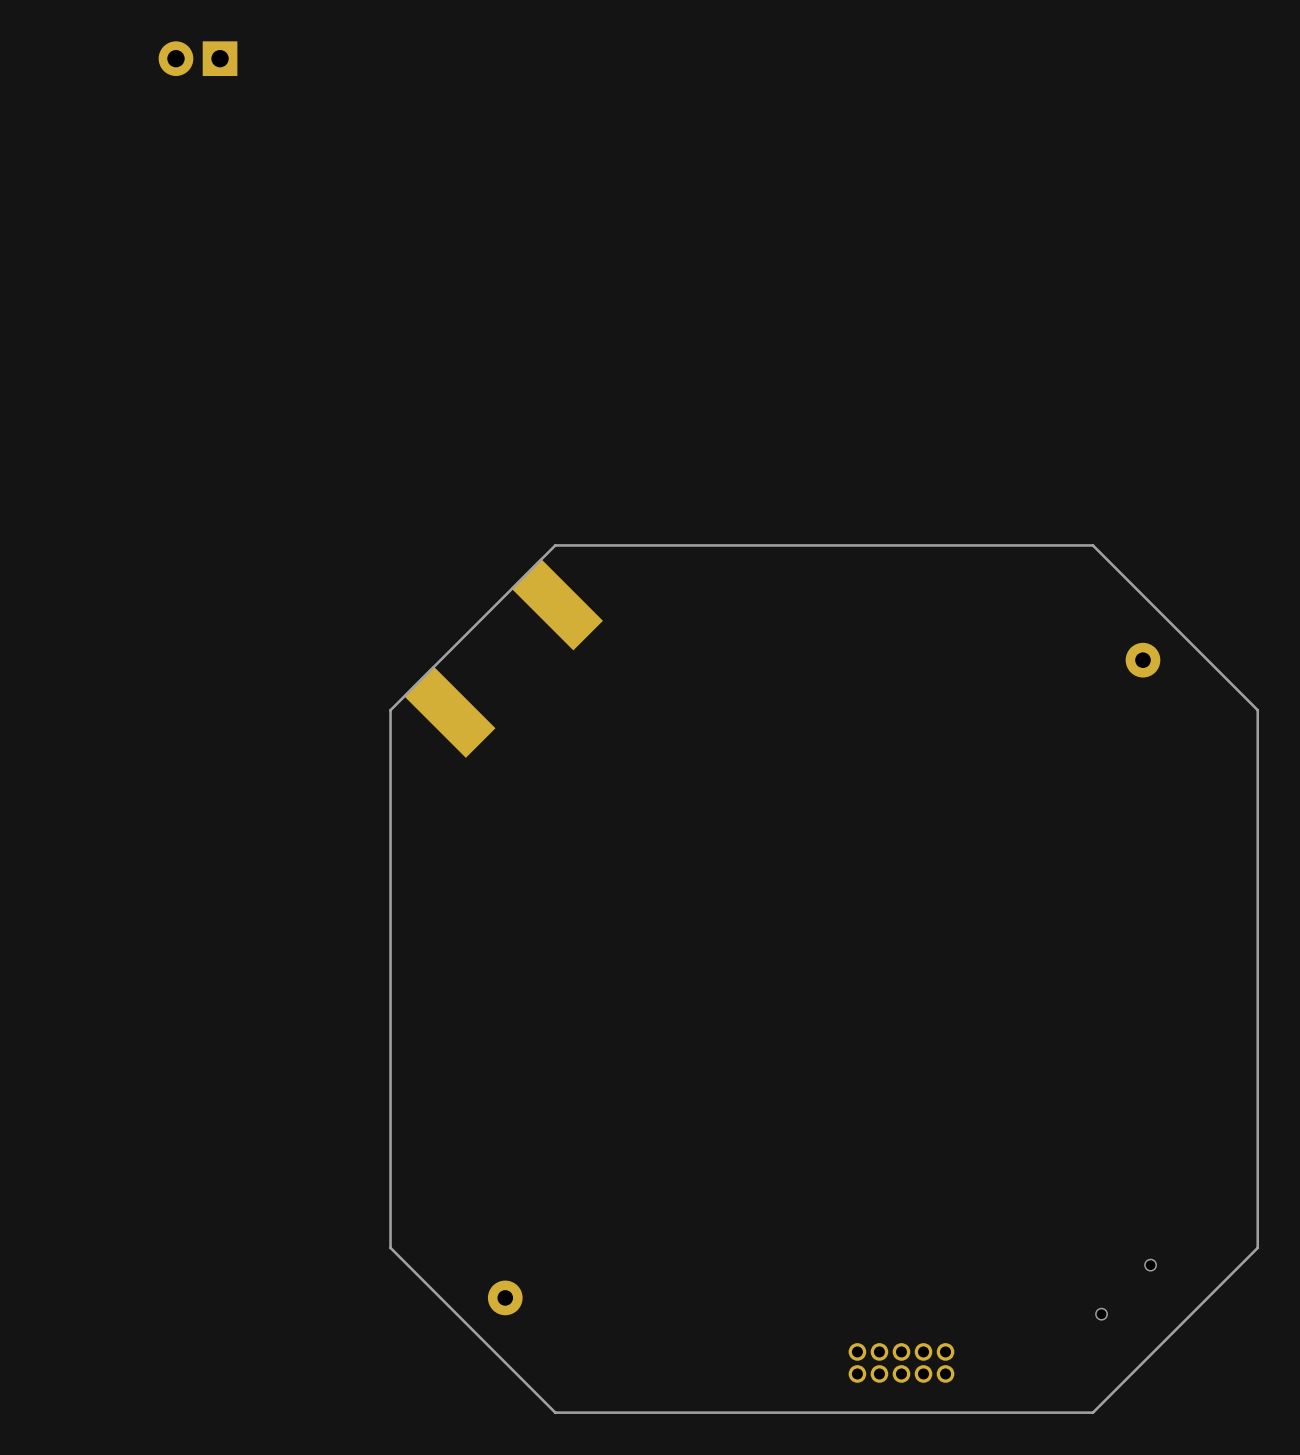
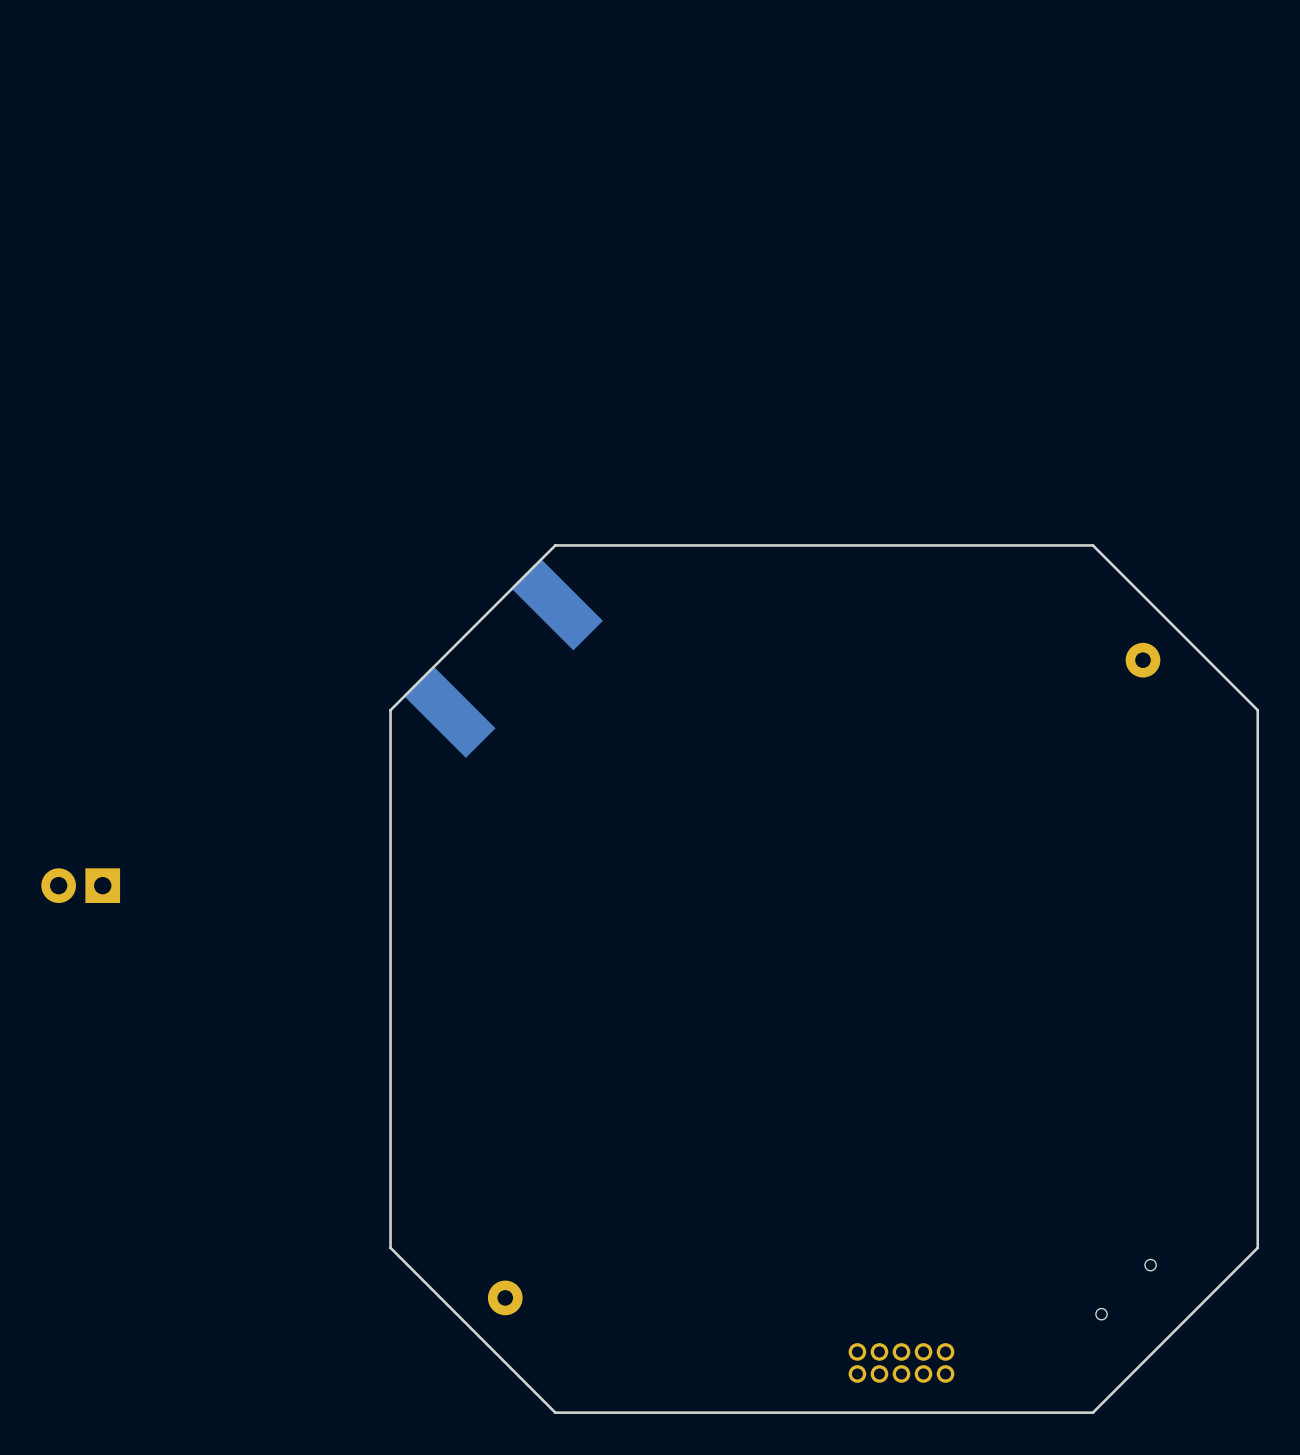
part: (198, 58) -> none
part: none -> (80, 885)

